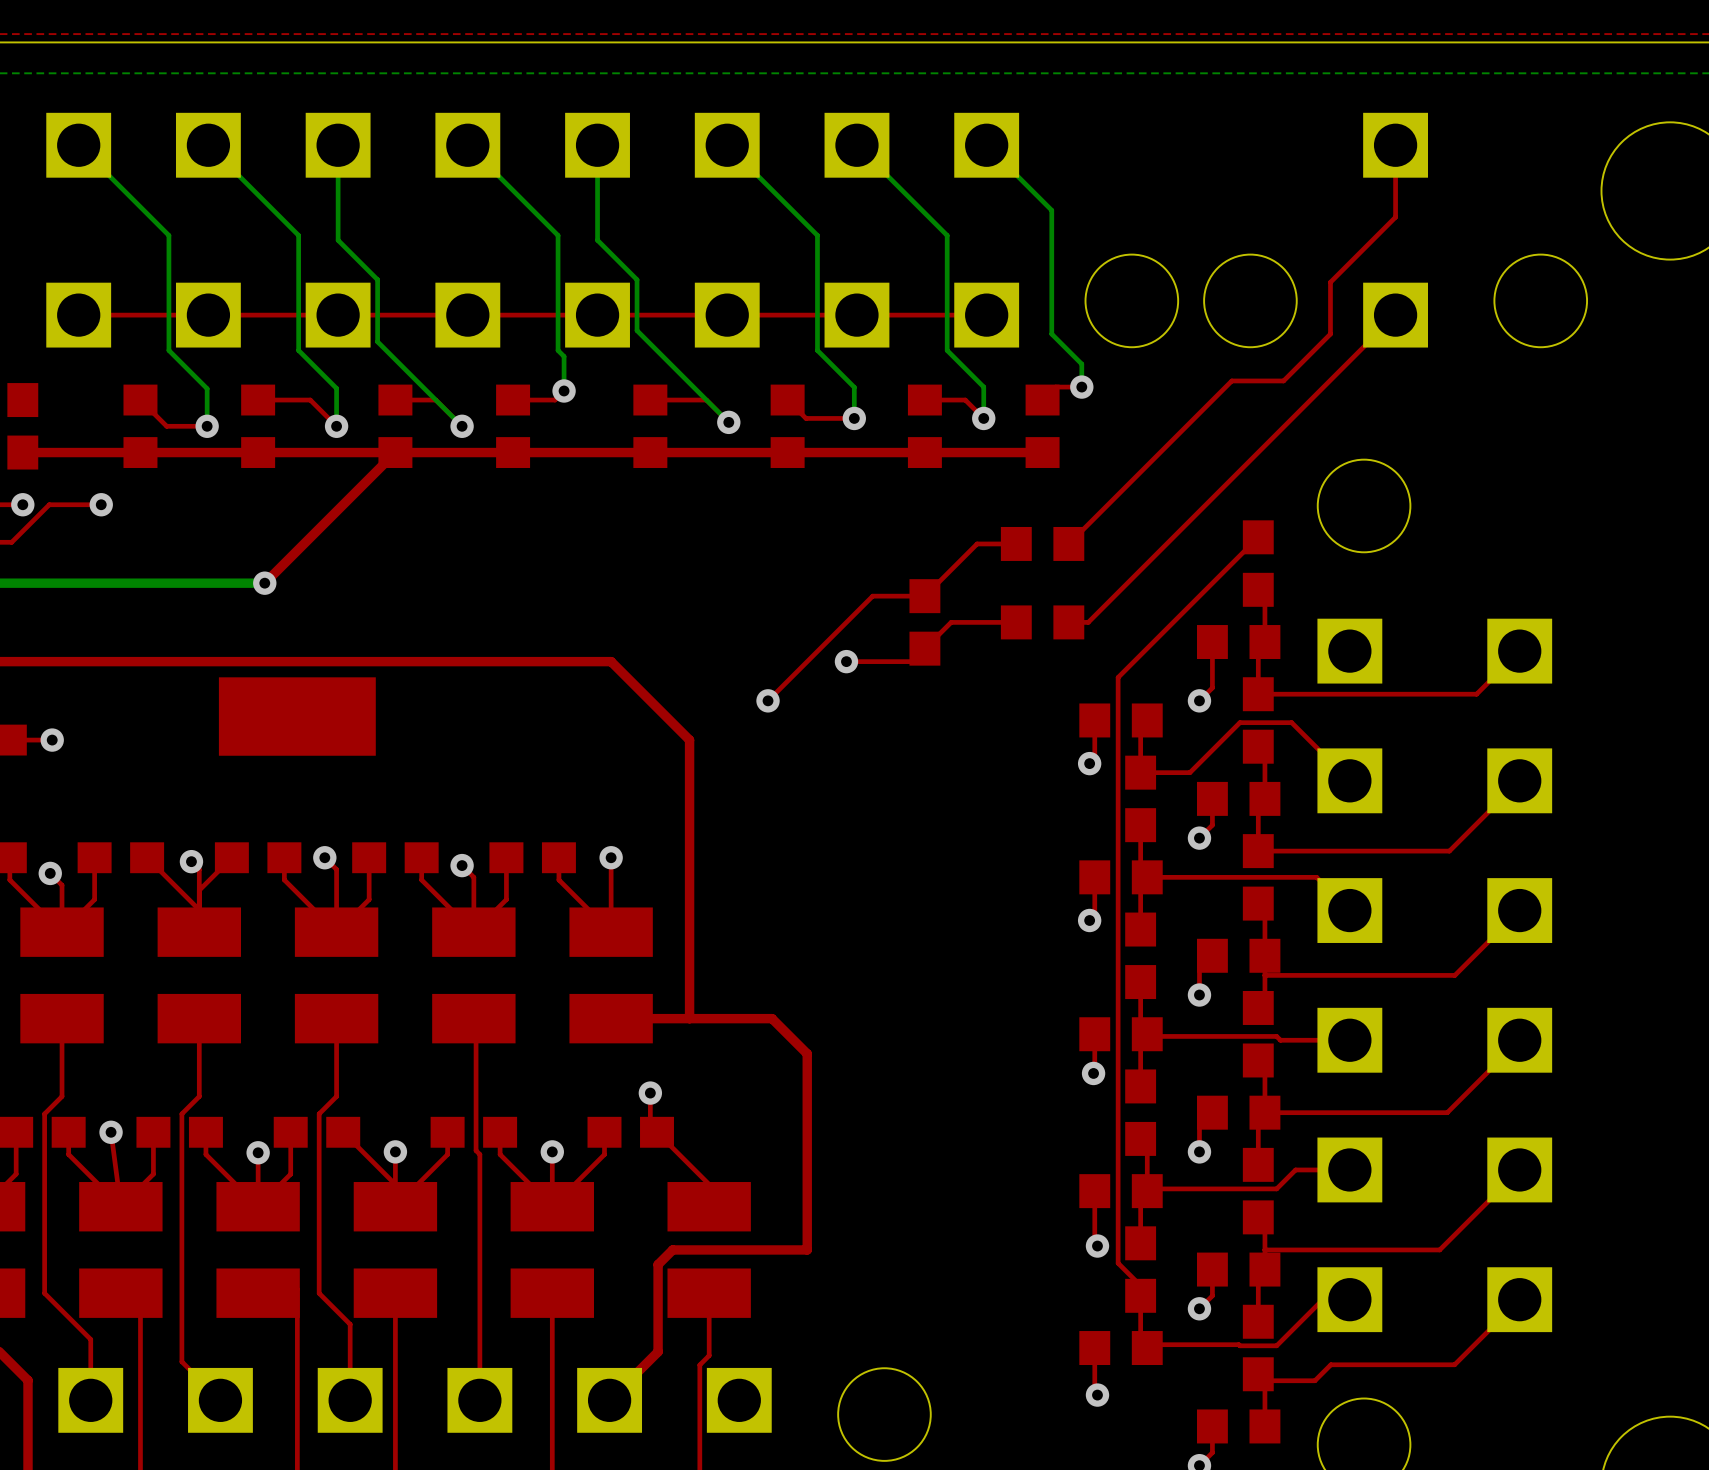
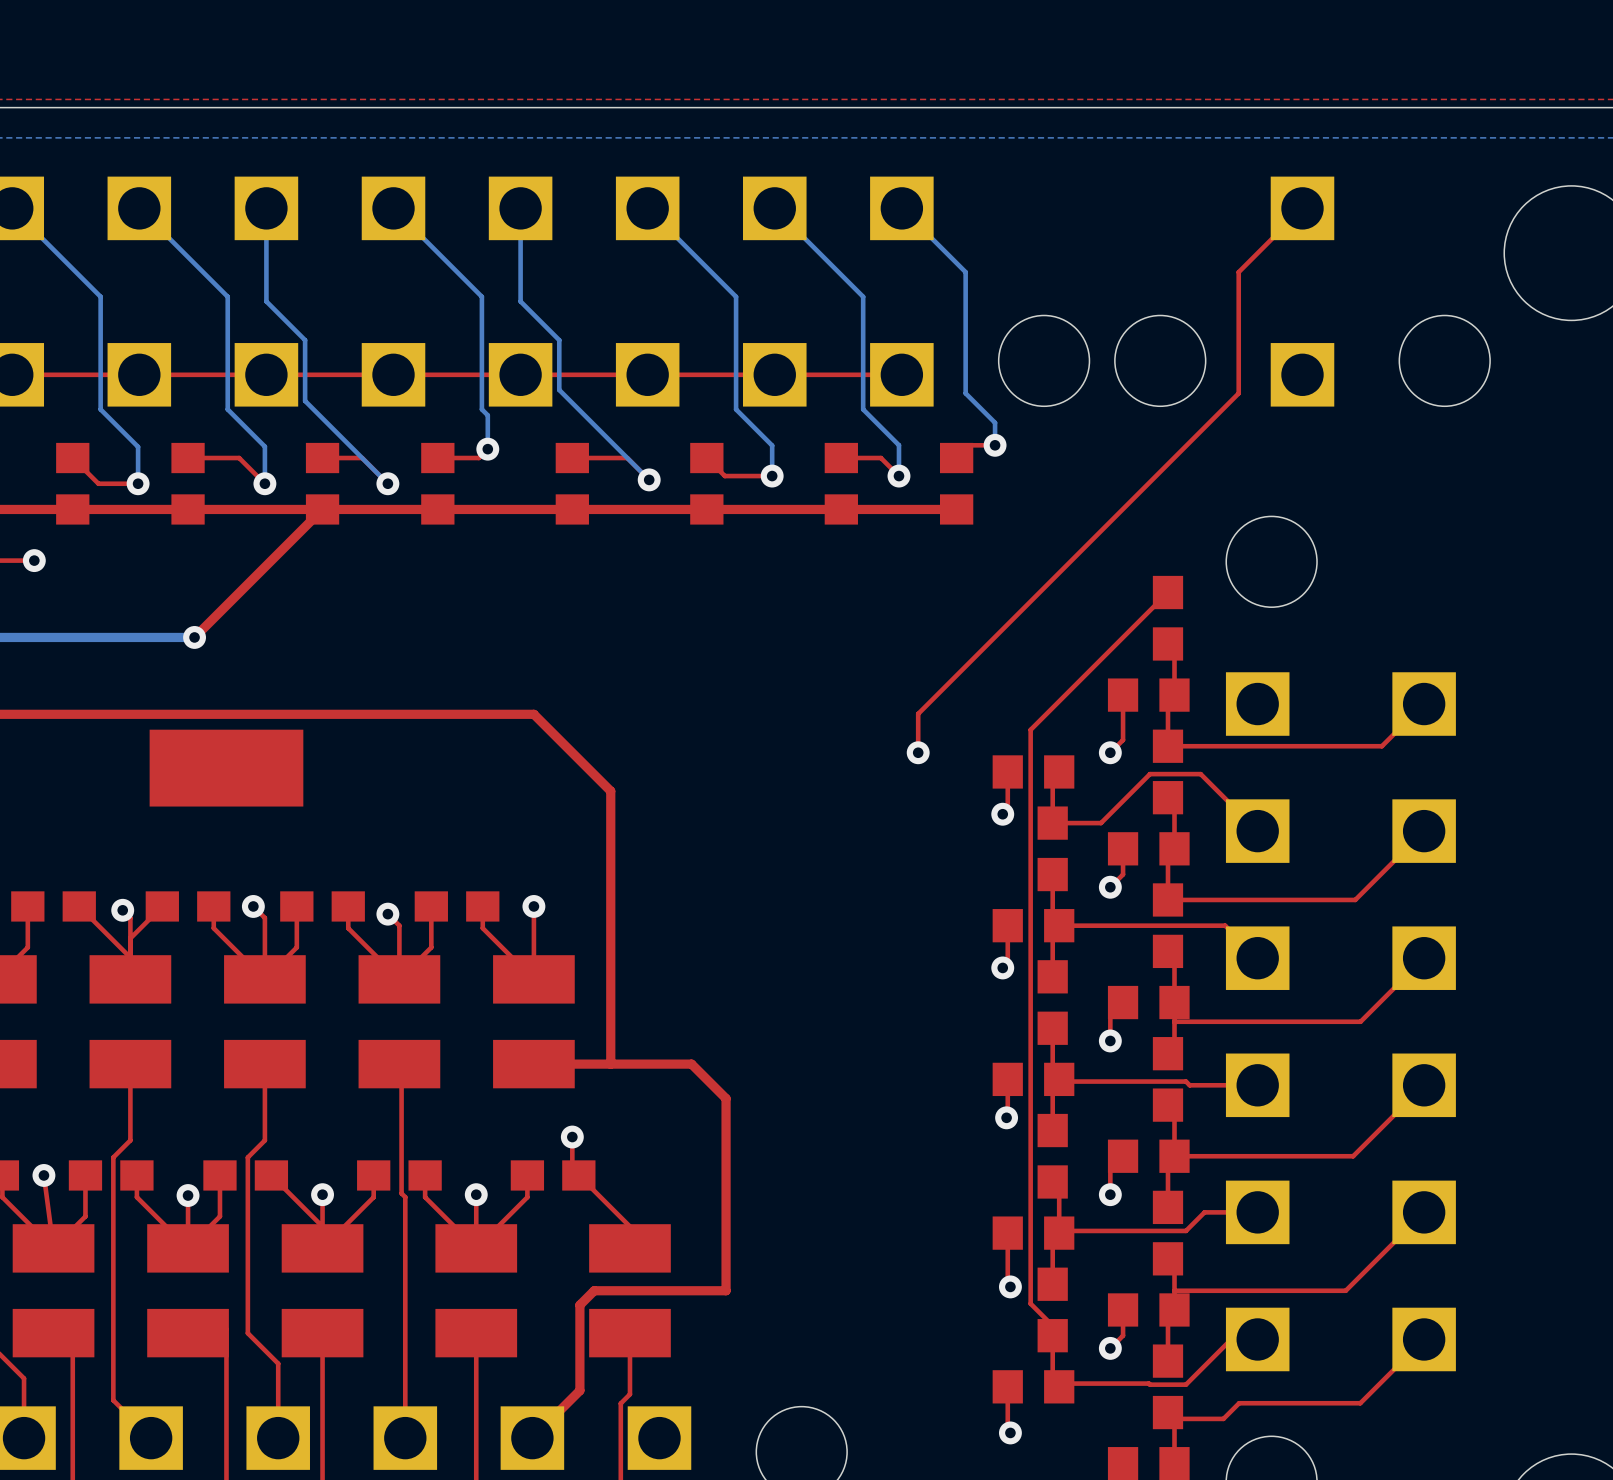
top track: (1395, 145) (1395, 217) (1330, 282) -> (1302, 208) (1238, 272) (1238, 342)
top track: (1395, 315) (1088, 622) (1068, 622) -> none
top track: (1283, 380) (1231, 380) (1068, 543) -> (1192, 439) (918, 713) (918, 752)
top track: (1016, 543) (977, 543) (924, 596) (872, 596) (768, 700) -> none
part: (1042, 543) -> none
part: (924, 622) -> none
top track: (1016, 622) (951, 622) (911, 661) (846, 661) -> none
part: (1042, 622) -> none
via: (846, 661) -> none
via: (768, 700) -> none
via: none -> (918, 752)

